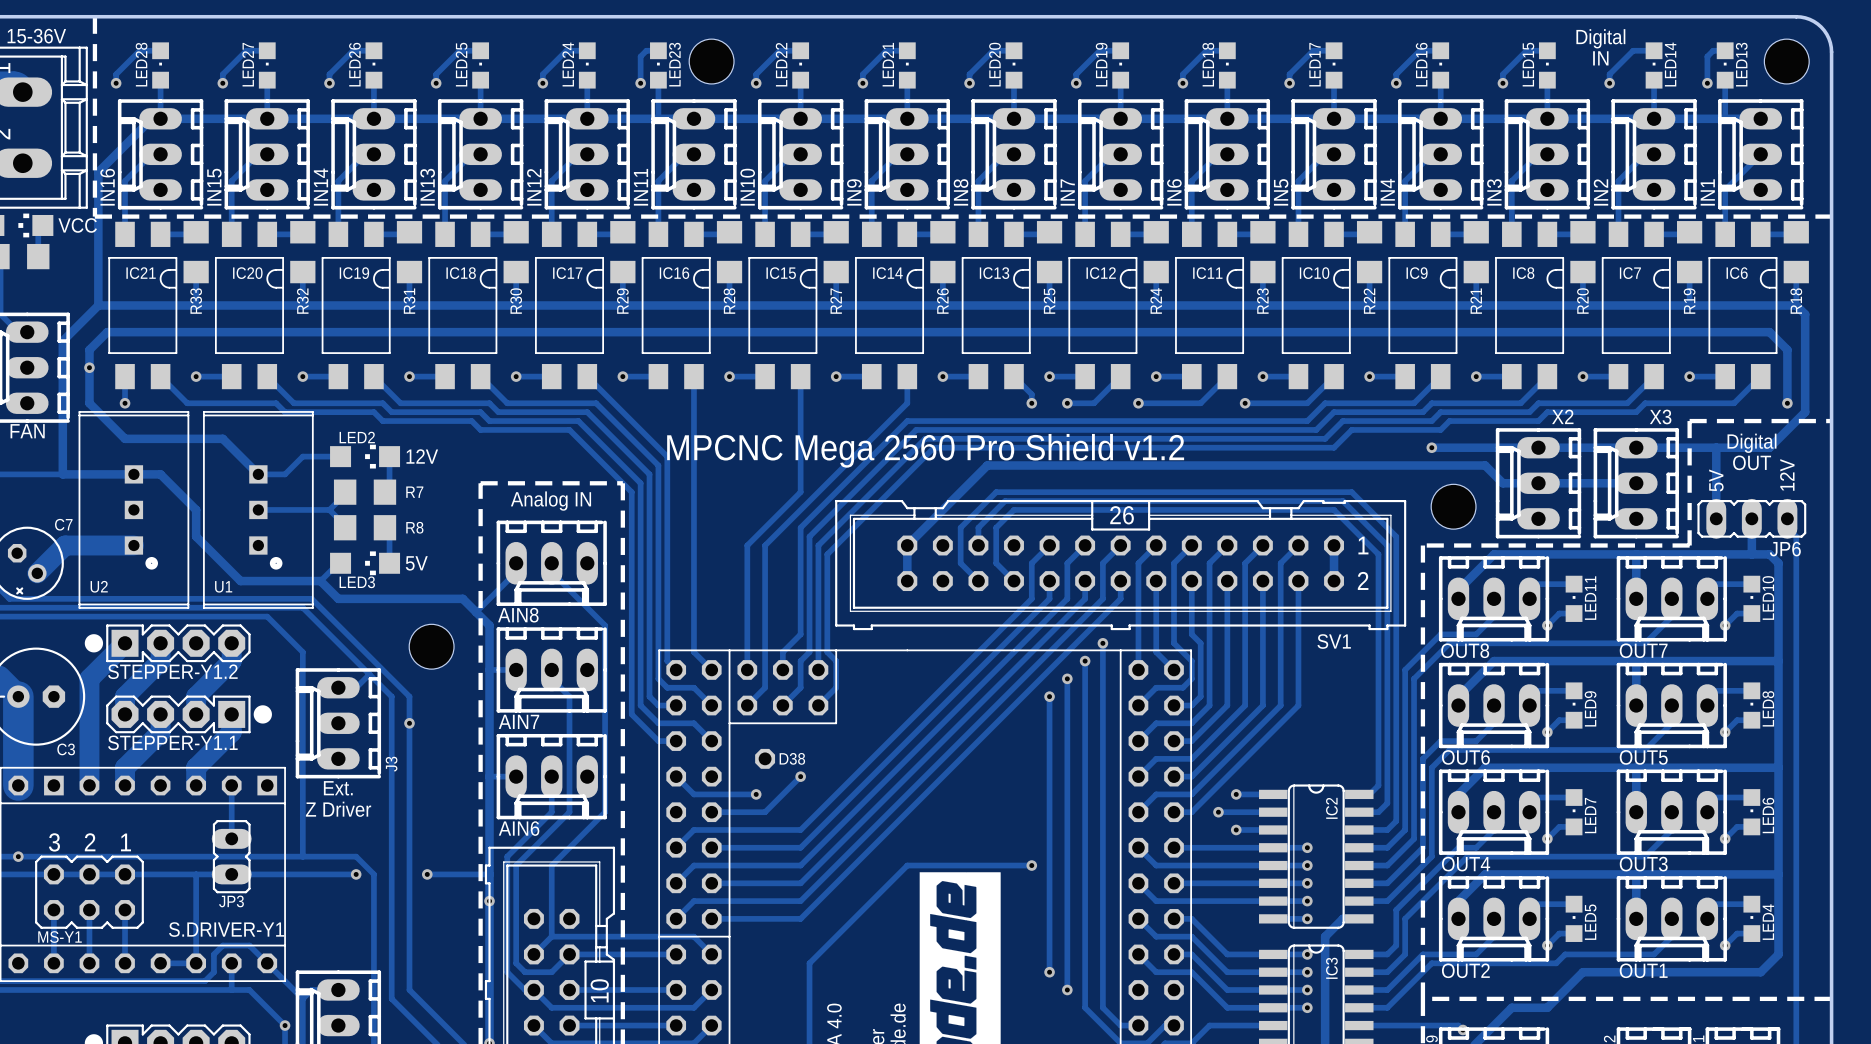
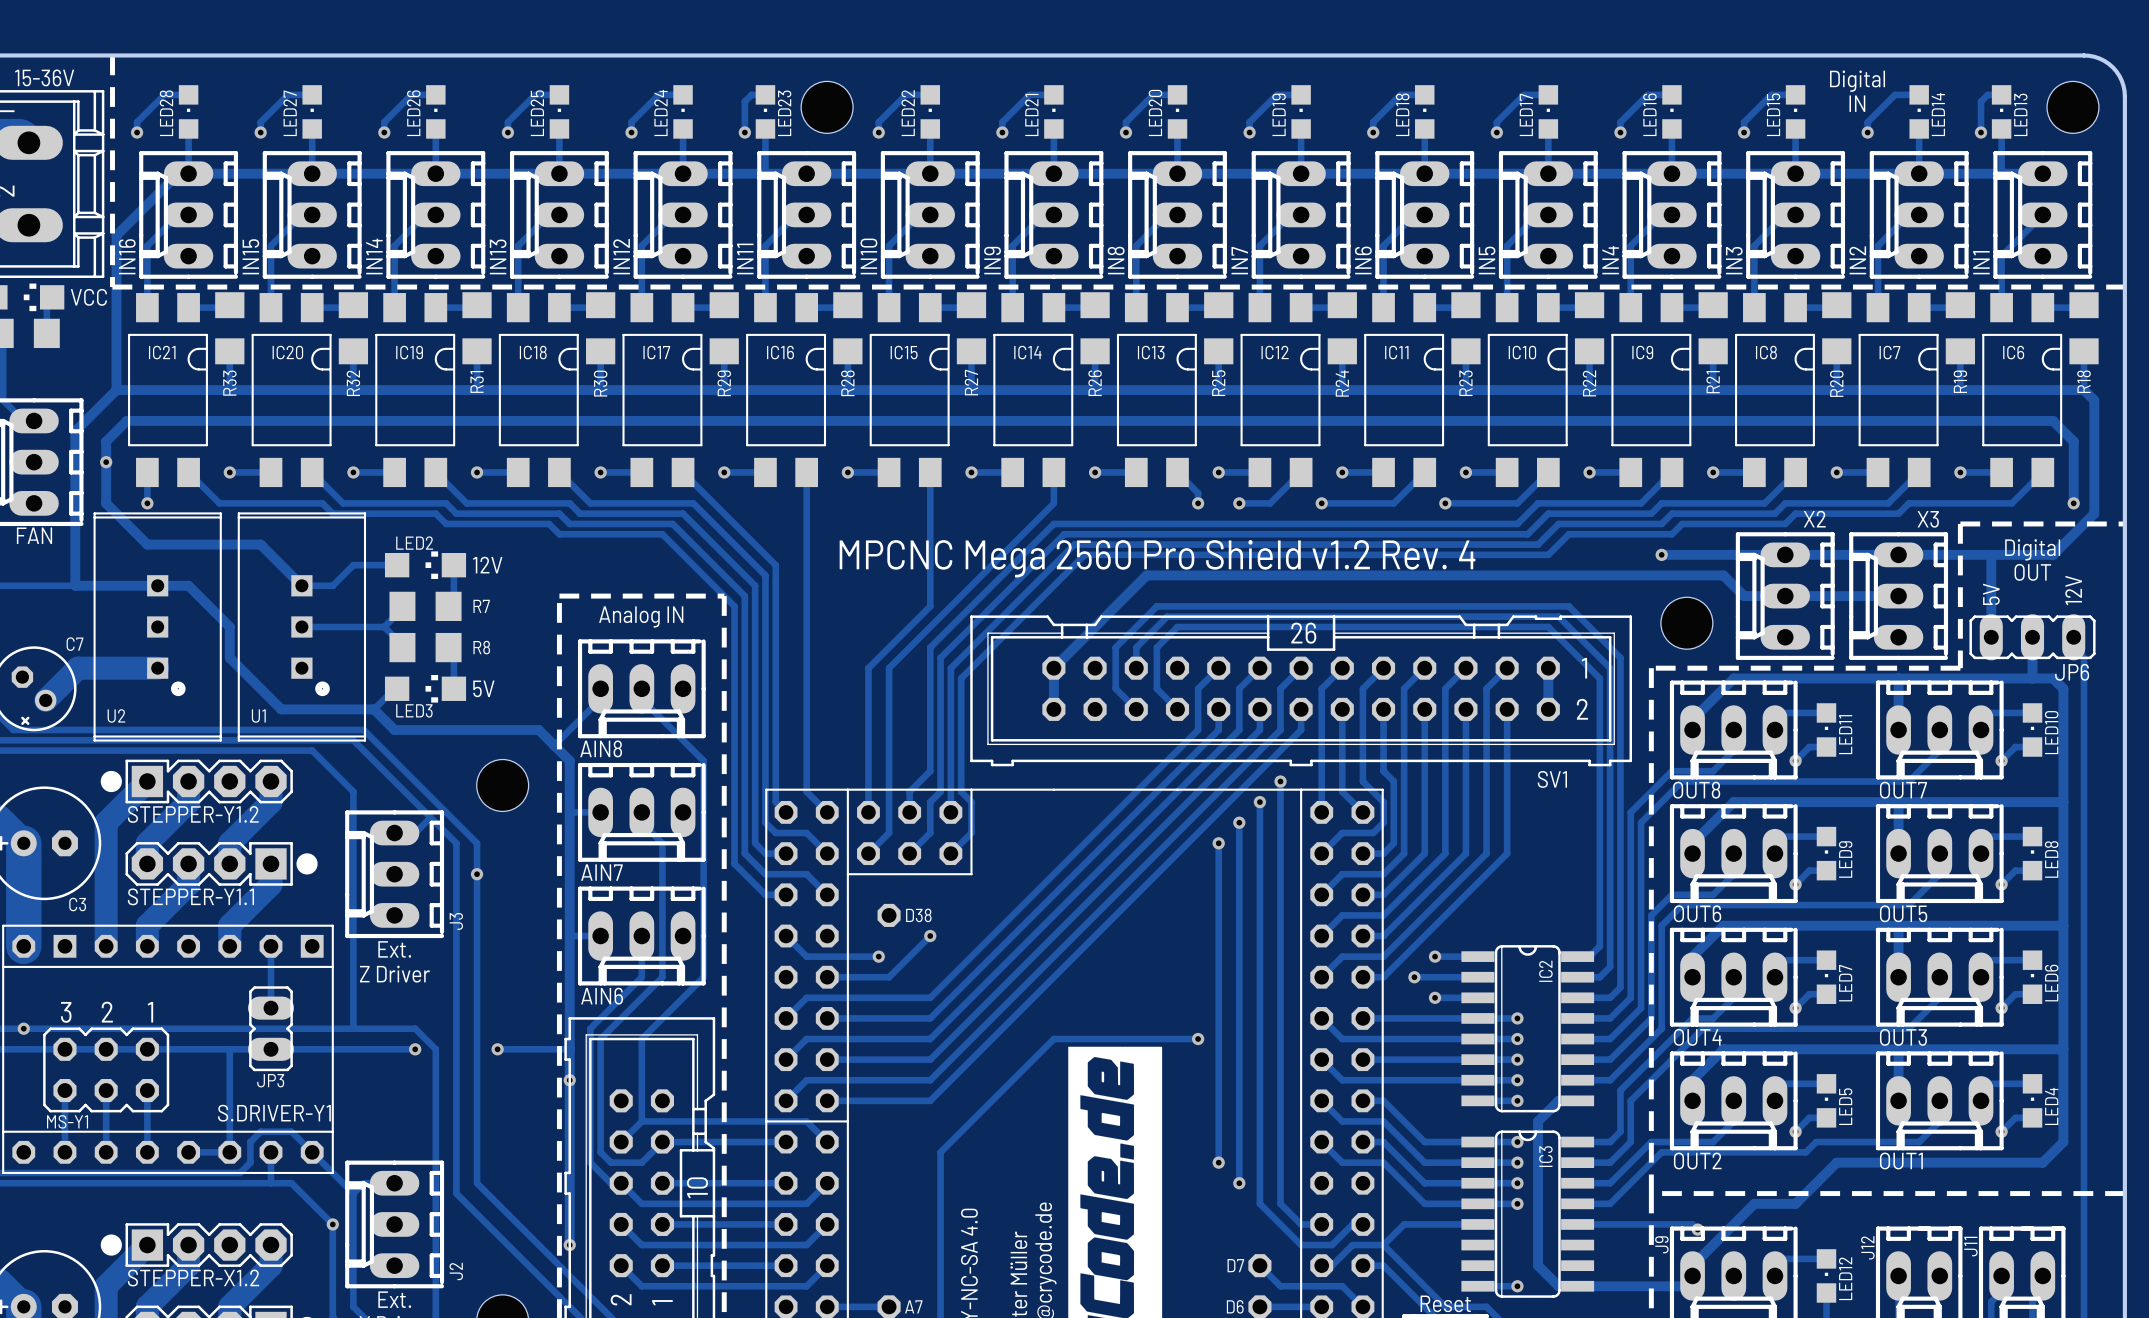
text: MPCNC Mega 2560 Pro Shield v1.2 (925, 450) -> MPCNC Mega 2560 Pro Shield v1.2 Rev. 4 (1157, 558)

